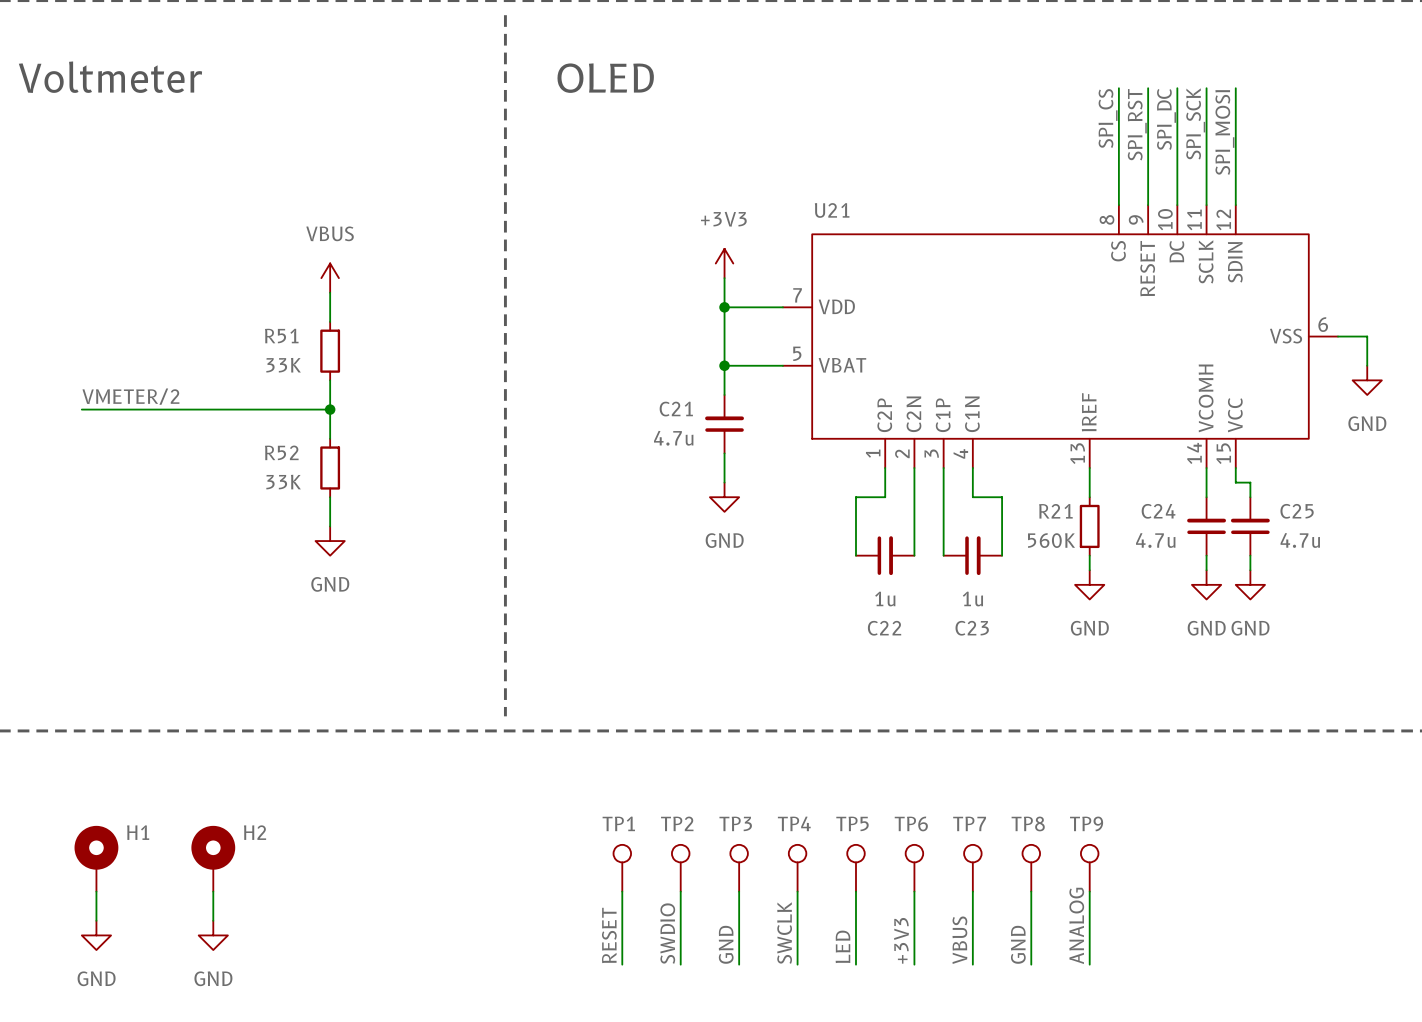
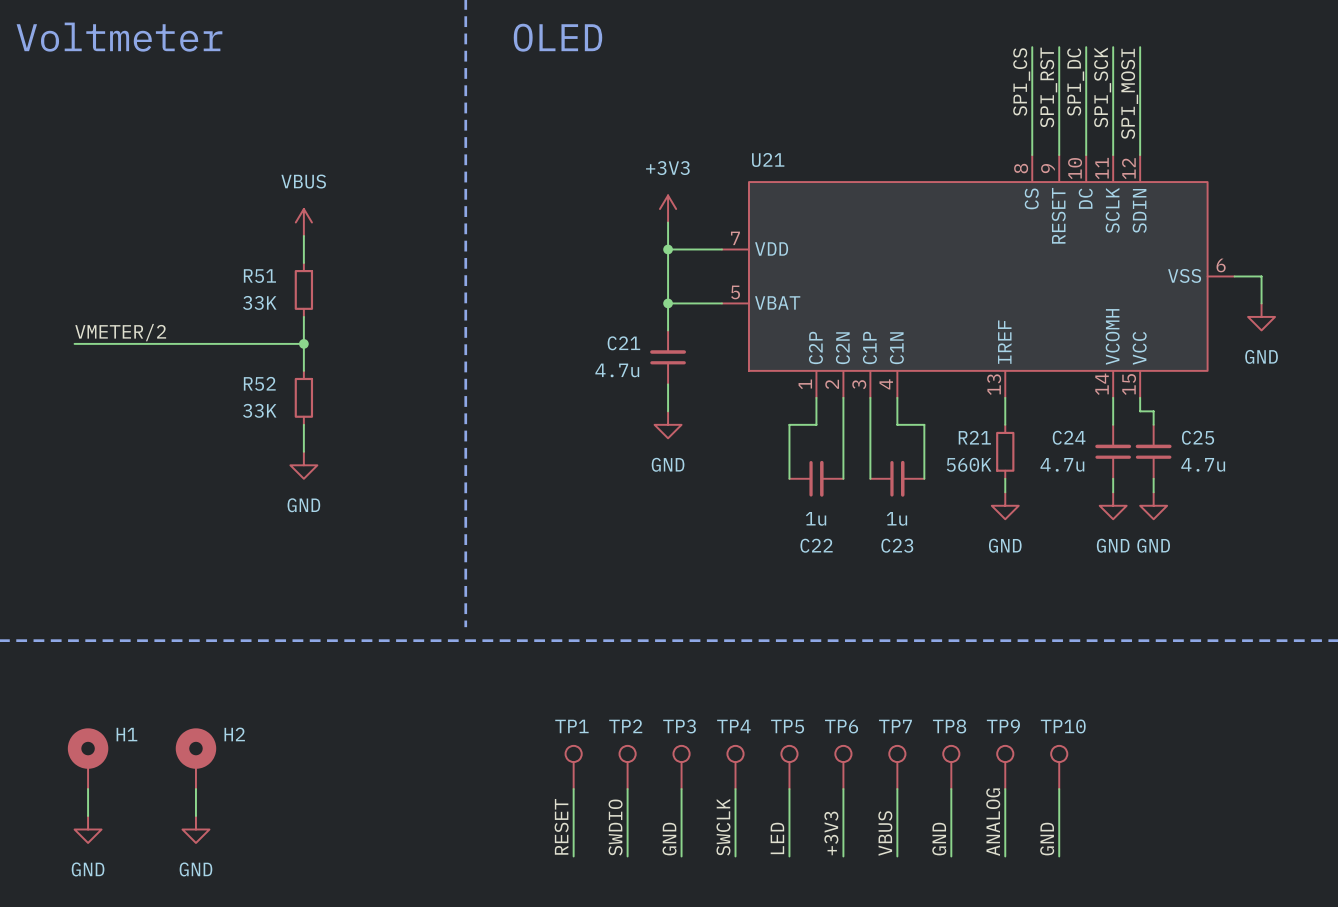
TP10: none -> (1059, 767)
wire: none -> (1059, 789) (1059, 856)
label: none -> GND (1047, 839)

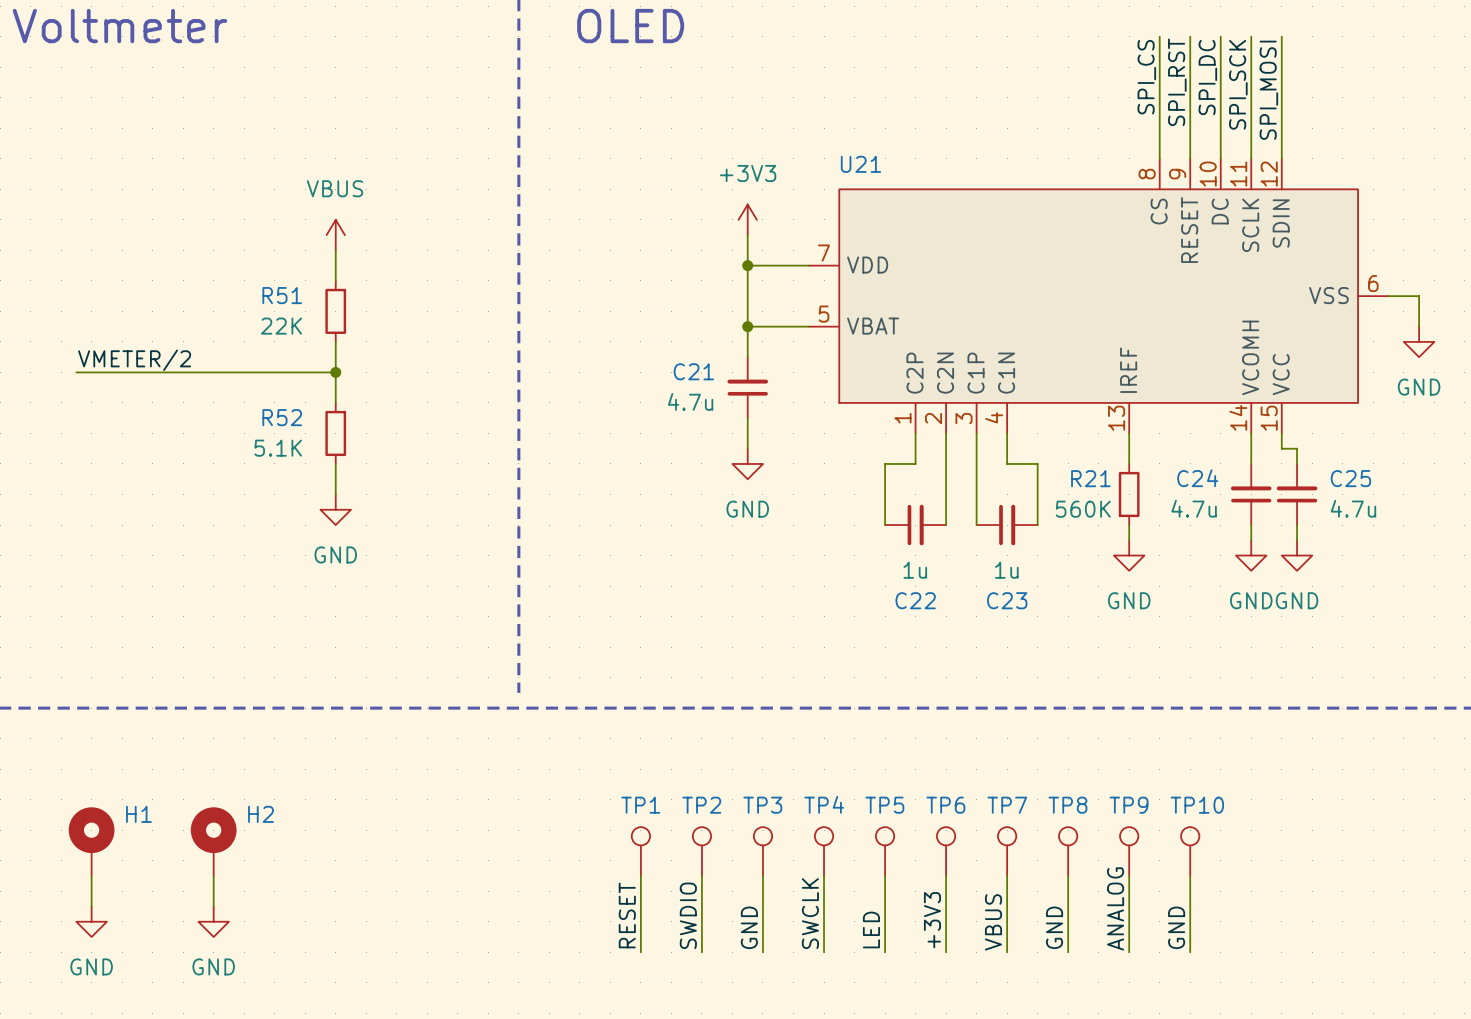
R51 value: 33K (259, 302) -> 22K (281, 326)
R52 value: 33K (259, 410) -> 5.1K (278, 448)

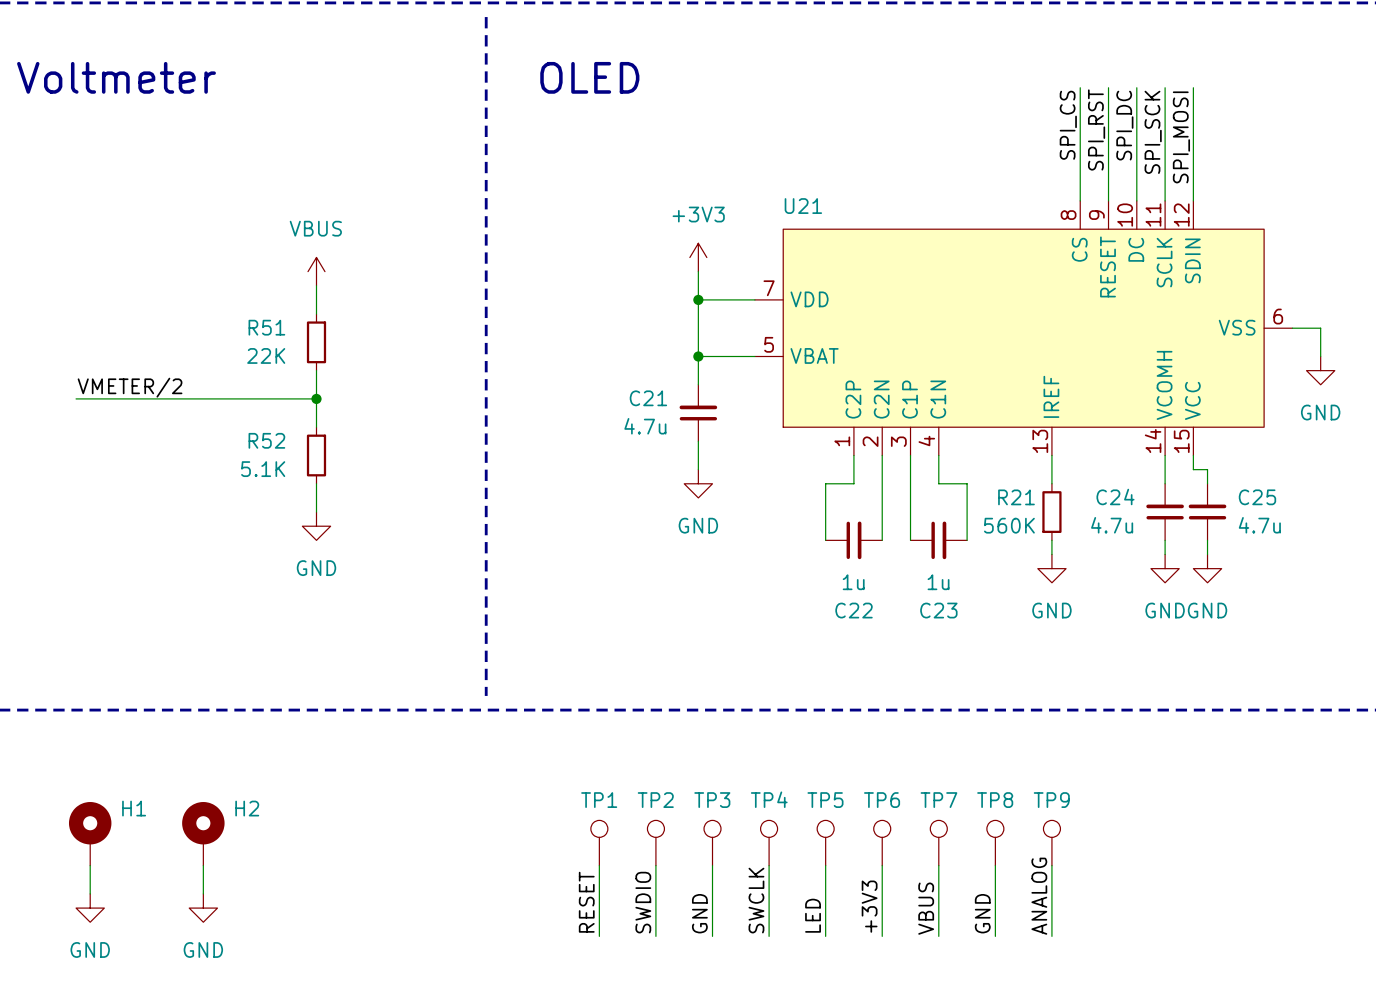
TP10: (1190, 851) -> none
wire: (1190, 875) (1190, 952) -> none
label: GND (1176, 927) -> none

